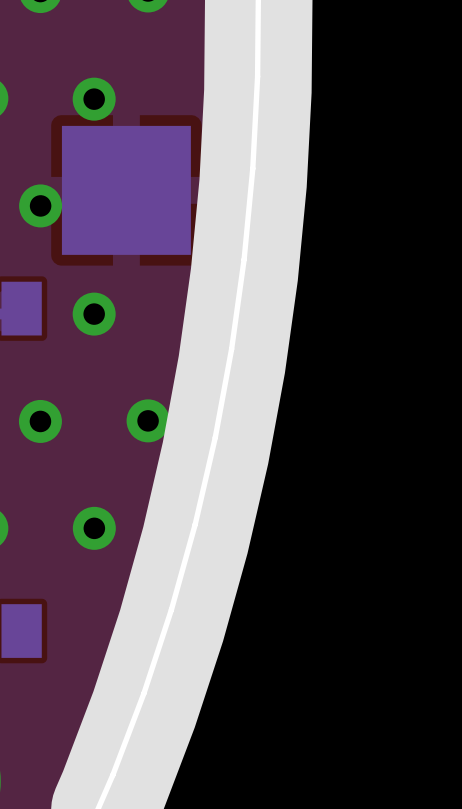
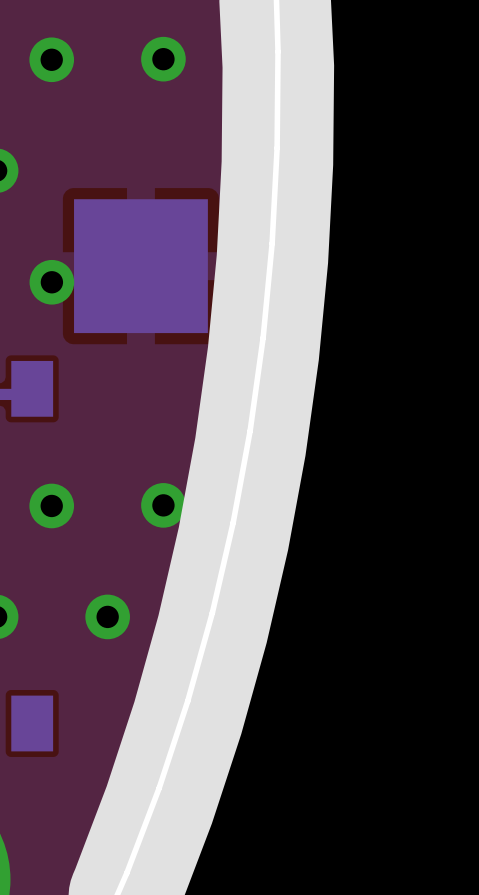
via: (94, 99) -> none
via: (94, 314) -> none

